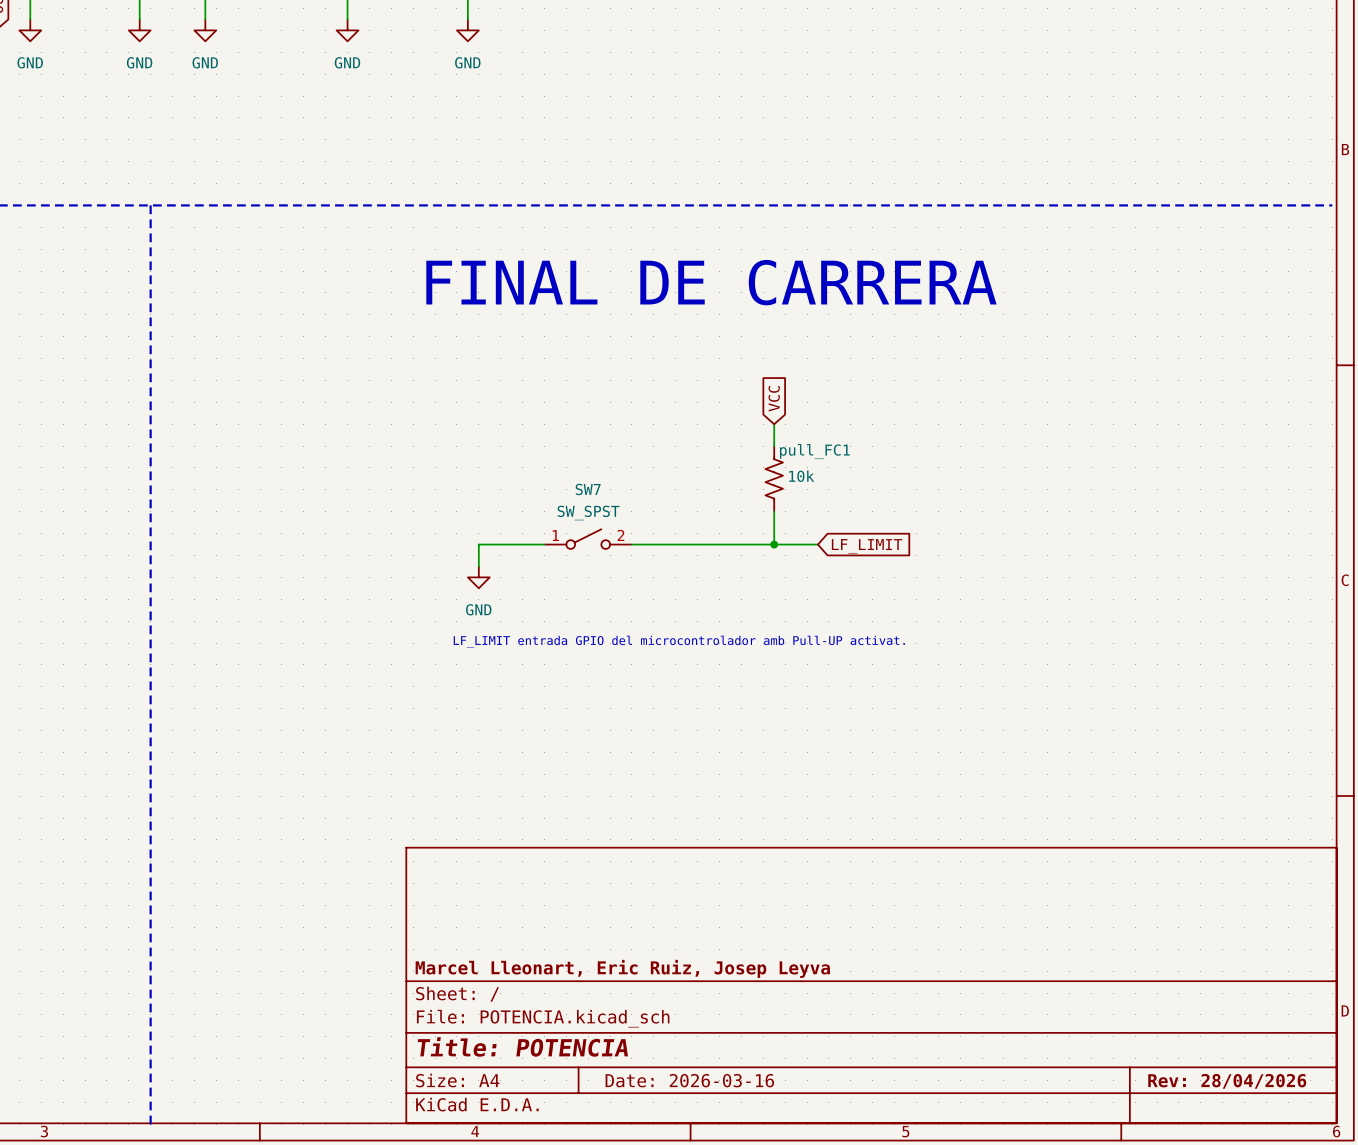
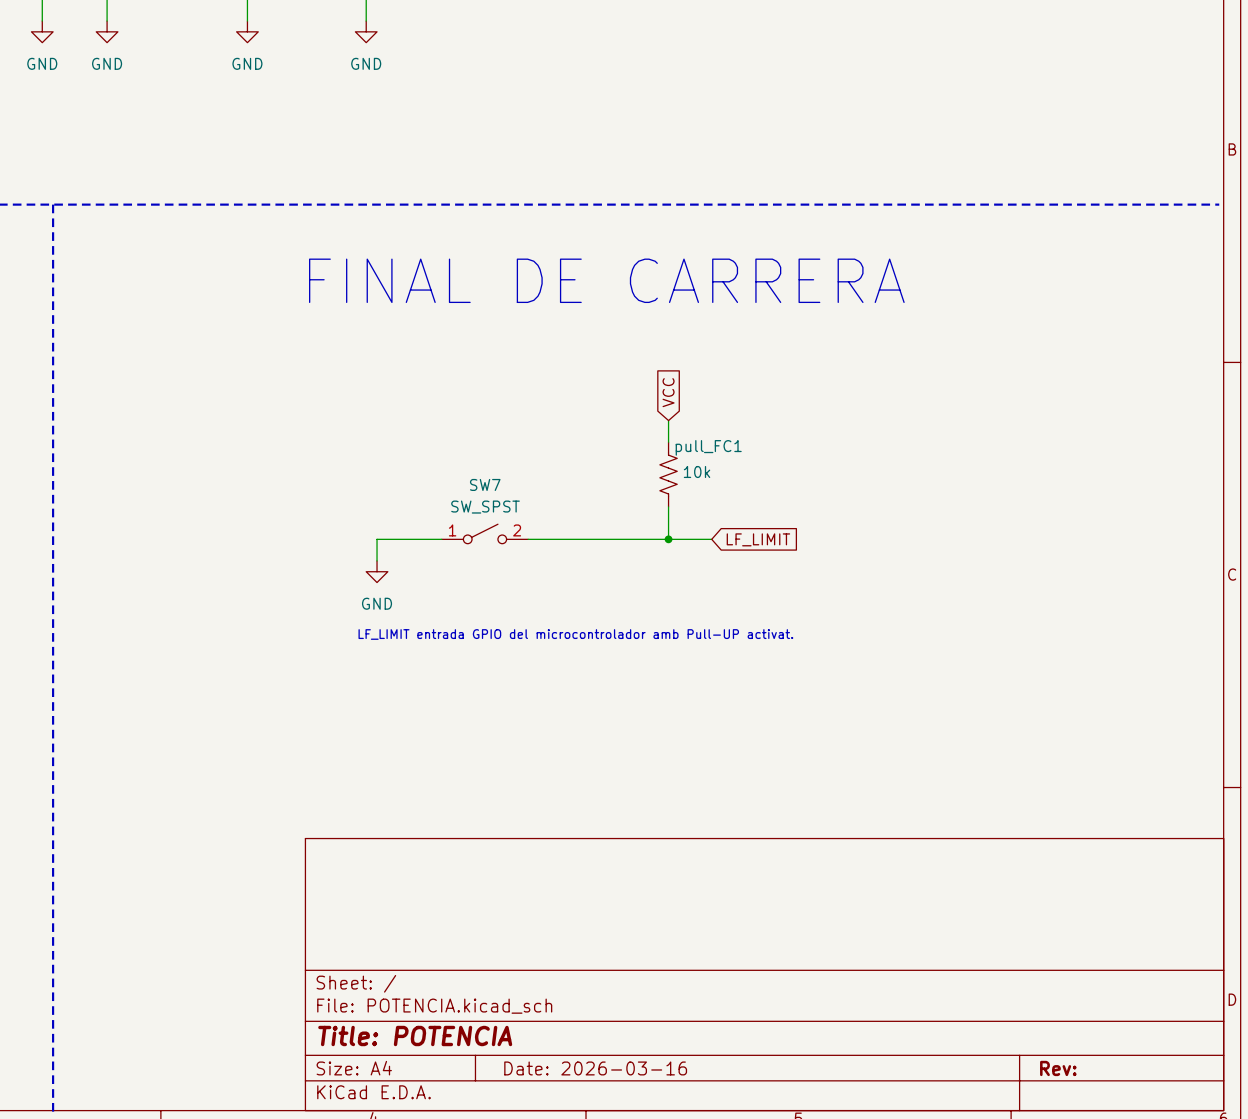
title block: Marcel Lleonart, Eric Ruiz, Josep Leyva (622, 968) -> none
title block: Rev: 28/04/2026 (1227, 1081) -> Rev: (1058, 1068)

